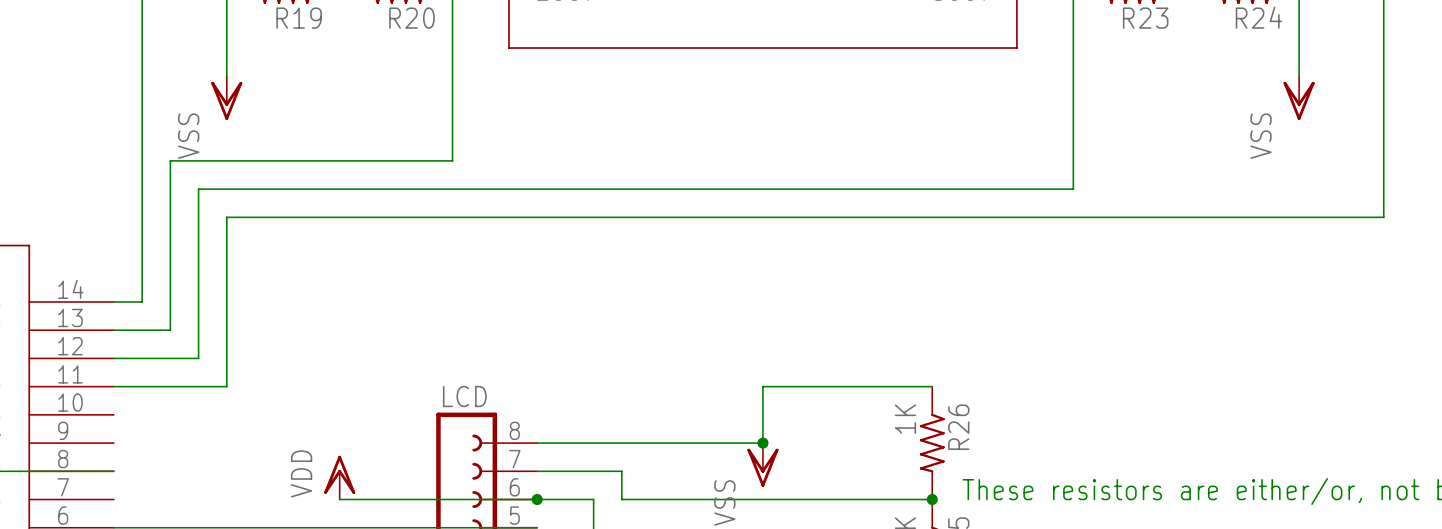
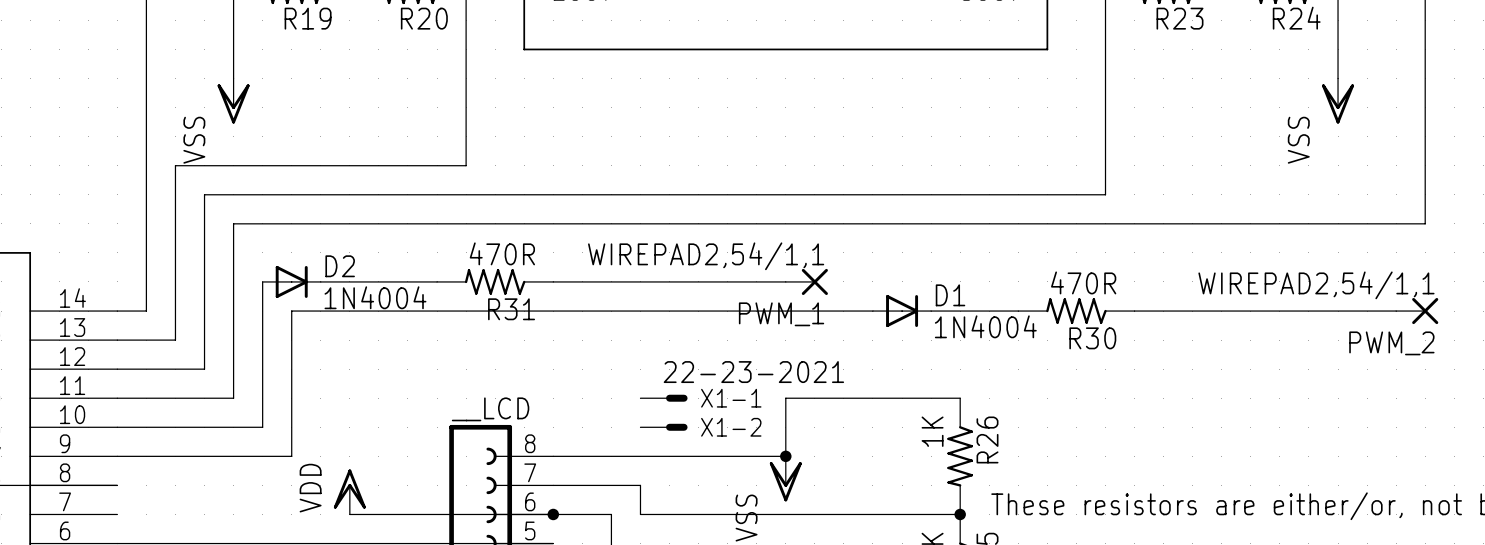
wire: none -> (262, 281) (262, 427) (117, 427)
D2: none -> 1N4004 (291, 281)
wire: none -> (320, 281) (437, 281)
R31: none -> 470R (495, 281)
wire: none -> (553, 281) (785, 281)
PWM_1: none -> WIREPAD2,54/1,1 (806, 281)
wire: none -> (872, 311) (291, 311) (291, 456) (117, 456)
D1: none -> 1N4004 (902, 311)
wire: none -> (931, 311) (1018, 311)
R30: none -> 470R (1076, 311)
wire: none -> (1134, 311) (1396, 311)
PWM_2: none -> WIREPAD2,54/1,1 (1417, 311)
X1-1: none -> 22-23-2021 (664, 398)
LCD name: LCD (464, 396) -> __LCD (490, 409)
X1-2: none -> (664, 427)

